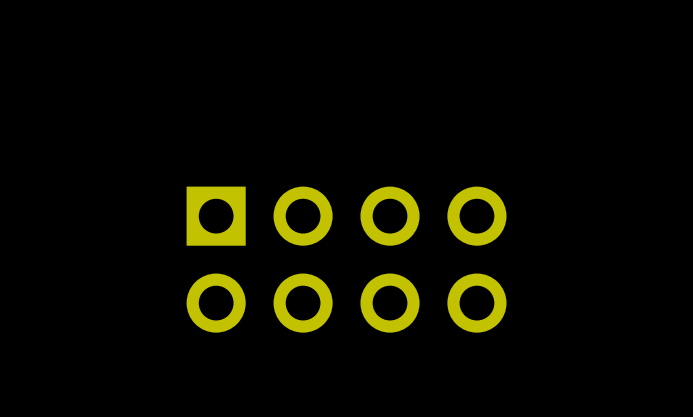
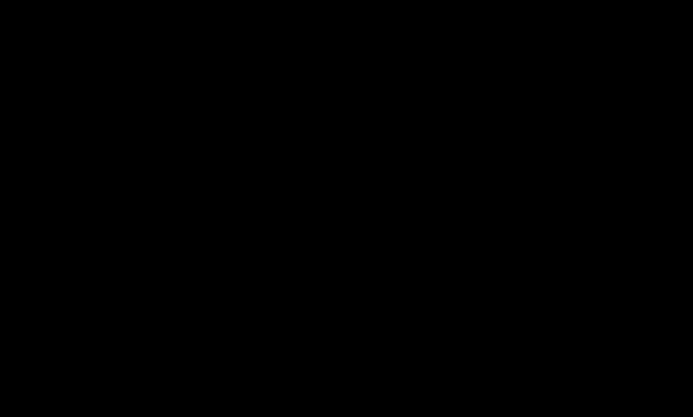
part: (346, 259) -> none

